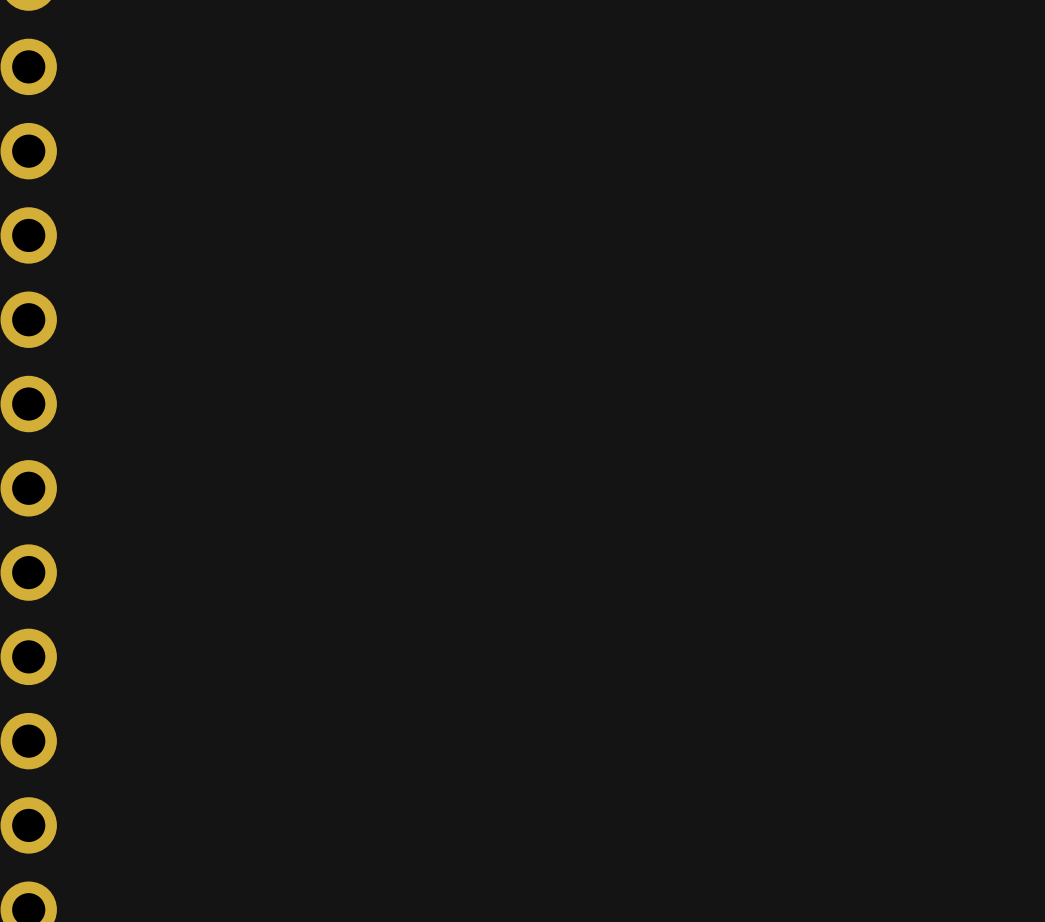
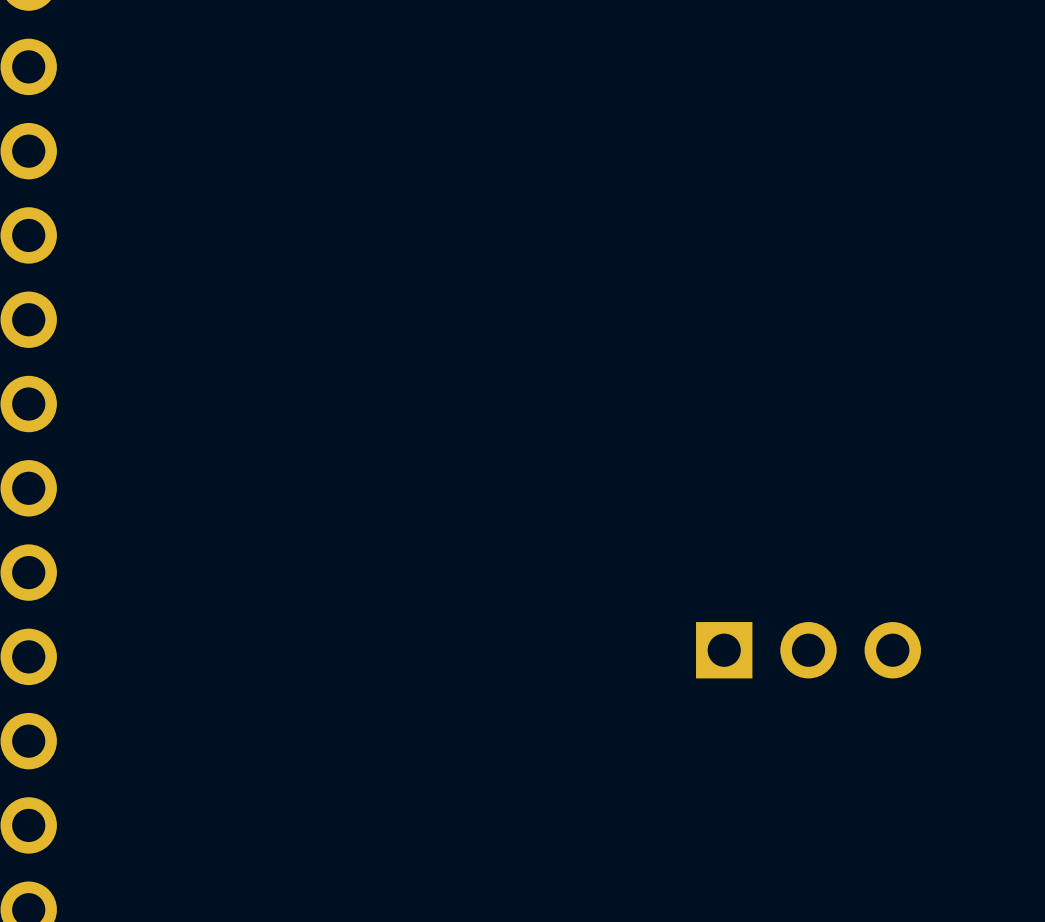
part: none -> (808, 650)

